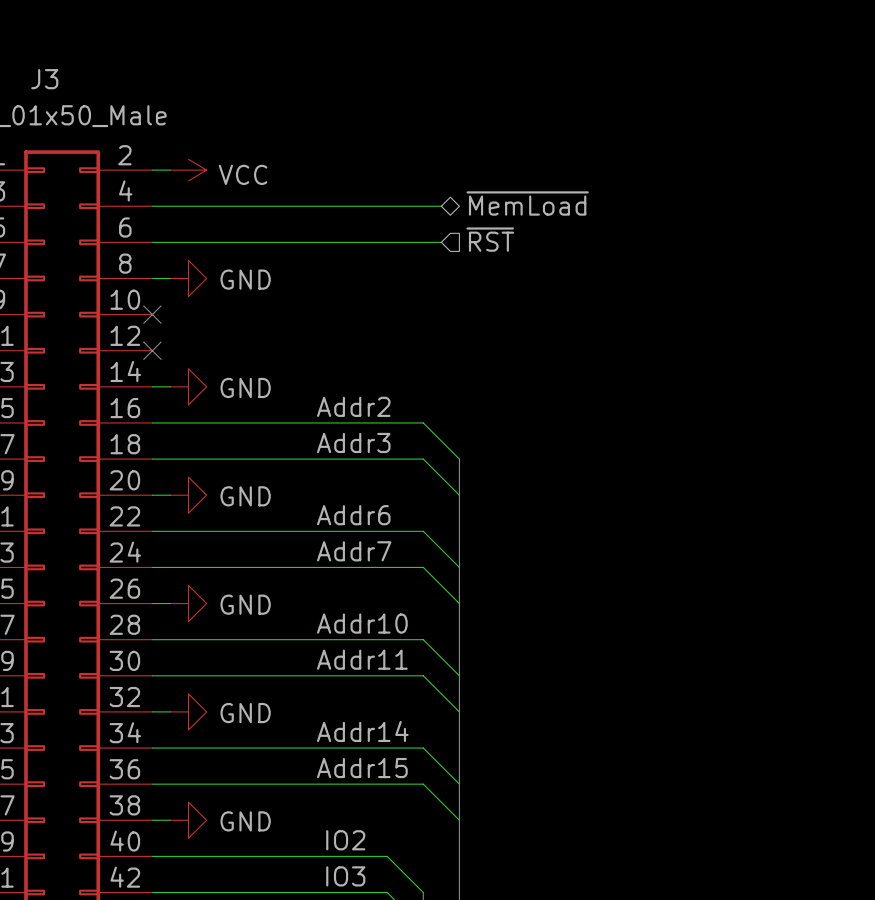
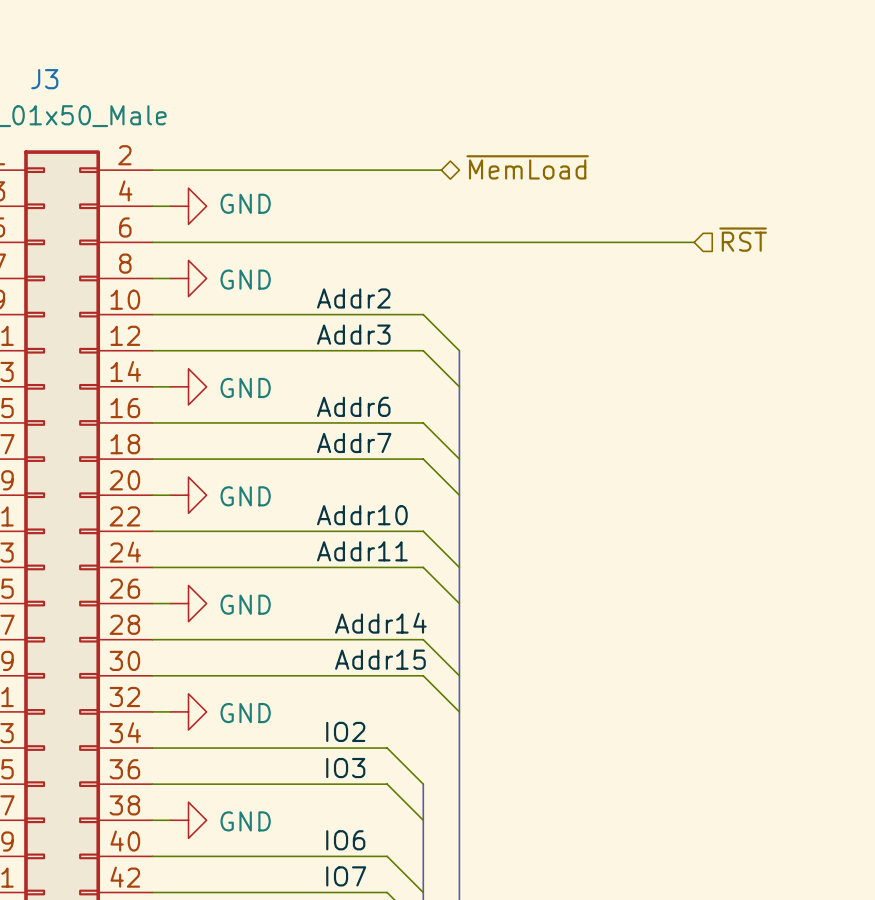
power symbol: VCC (188, 170) -> none
hierarchical label position: ~{MemLoad} (527, 203) -> ~{MemLoad} (527, 167)
wire: (170, 206) (441, 206) -> (170, 170) (441, 170)
power symbol: none -> GND (188, 206)
hierarchical label position: ~{RST} (490, 239) -> ~{RST} (743, 239)
wire: none -> (441, 242) (694, 242)
label: none -> Addr2 (353, 298)
wire: none -> (152, 314) (423, 314) (459, 350)
no-connect mark: (152, 314) -> none
label: none -> Addr3 (353, 334)
wire: none -> (152, 350) (423, 350) (459, 386)
no-connect mark: (152, 350) -> none
bus: none -> (459, 350) (459, 459)
label: Addr2 (353, 406) -> Addr6 (353, 406)
label: Addr3 (353, 442) -> Addr7 (354, 442)
label: Addr6 (353, 515) -> Addr10 (362, 515)
label: Addr7 (354, 551) -> Addr11 (362, 551)
label: Addr10 (362, 623) -> none
label: Addr11 (362, 659) -> none
label: none -> IO2 (345, 731)
label position: Addr14 (362, 731) -> Addr14 (380, 623)
wire: (387, 748) (423, 748) (459, 784) -> (387, 748) (423, 784)
label: none -> IO3 (345, 768)
label position: Addr15 (362, 768) -> Addr15 (380, 659)
wire: (387, 784) (423, 784) (459, 820) -> (387, 784) (423, 820)
bus: none -> (423, 784) (423, 892)
label: IO2 (345, 840) -> IO6 (345, 840)
label: IO3 (345, 876) -> IO7 (346, 876)

